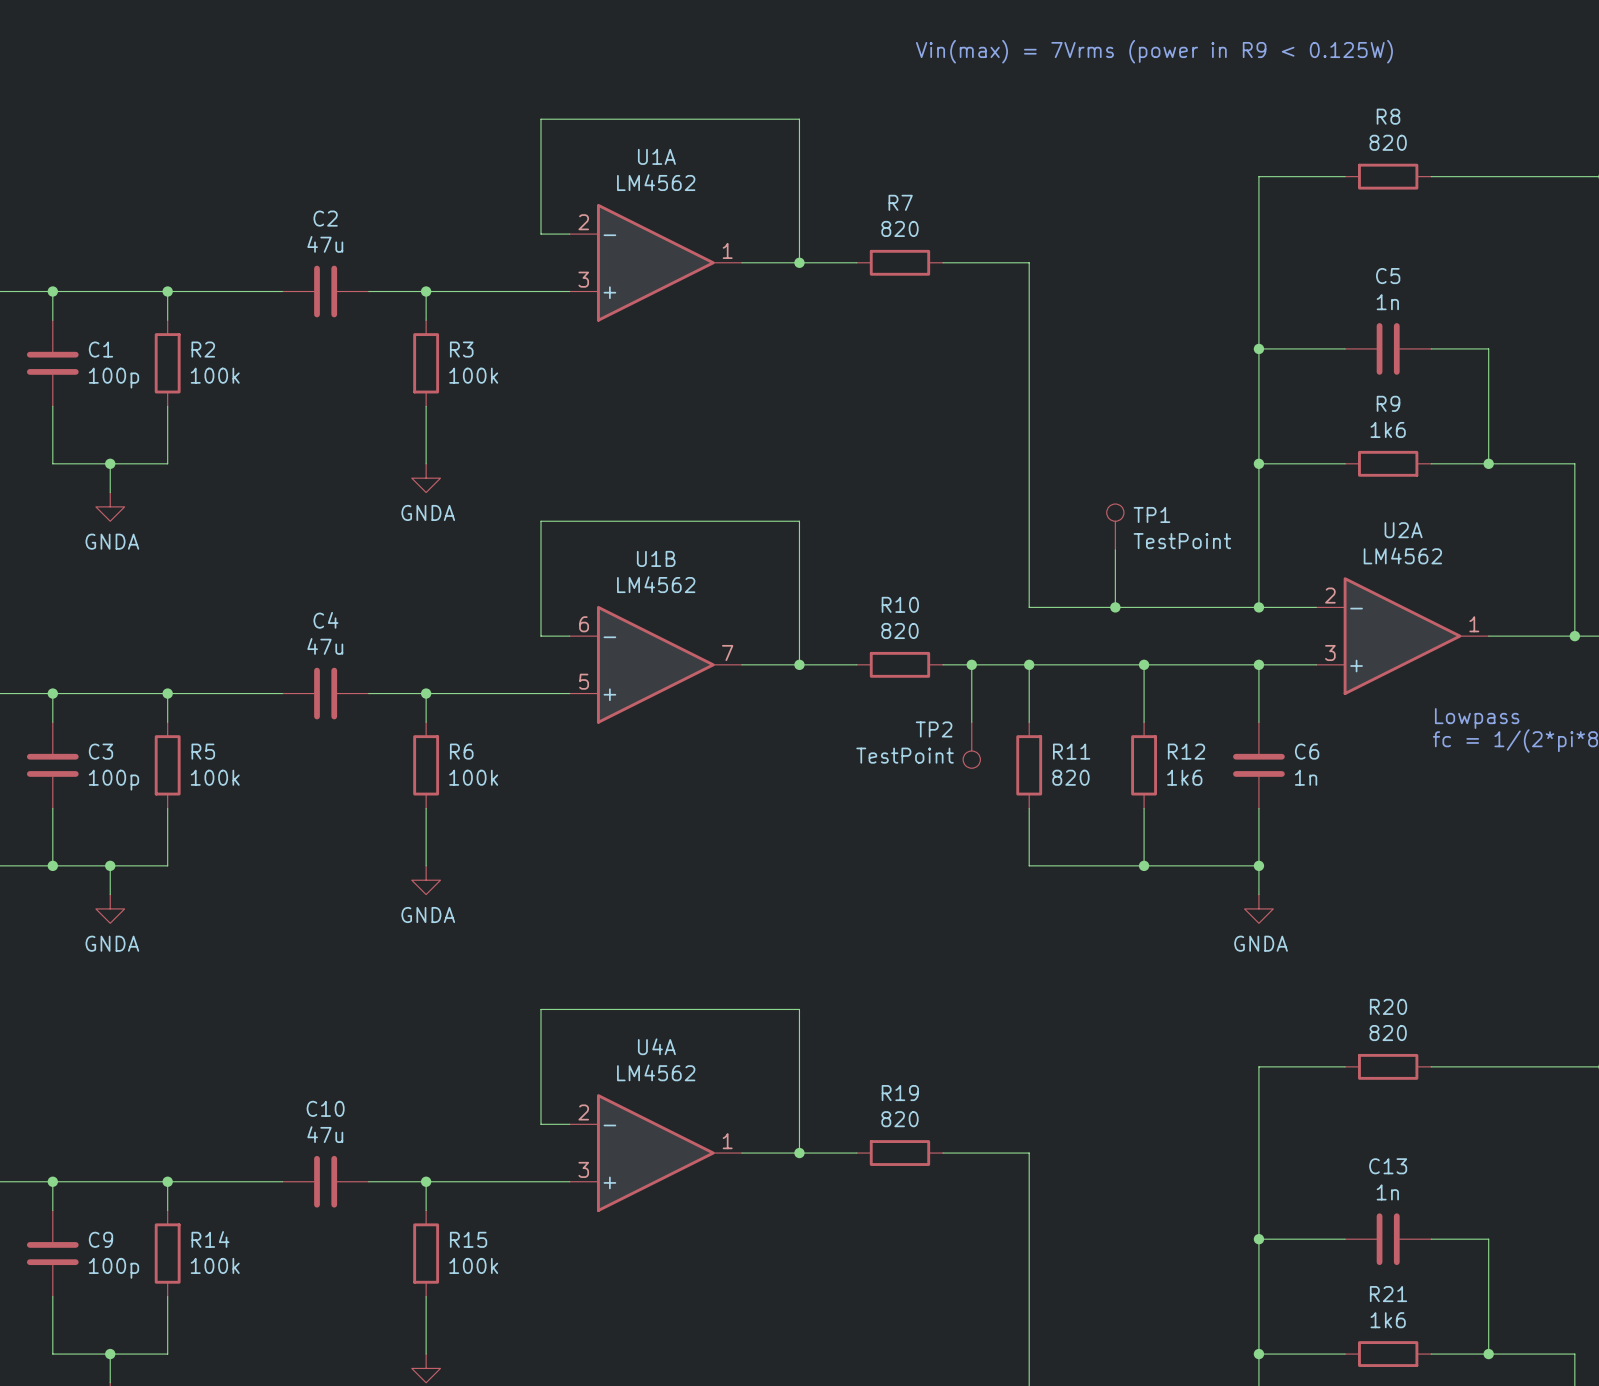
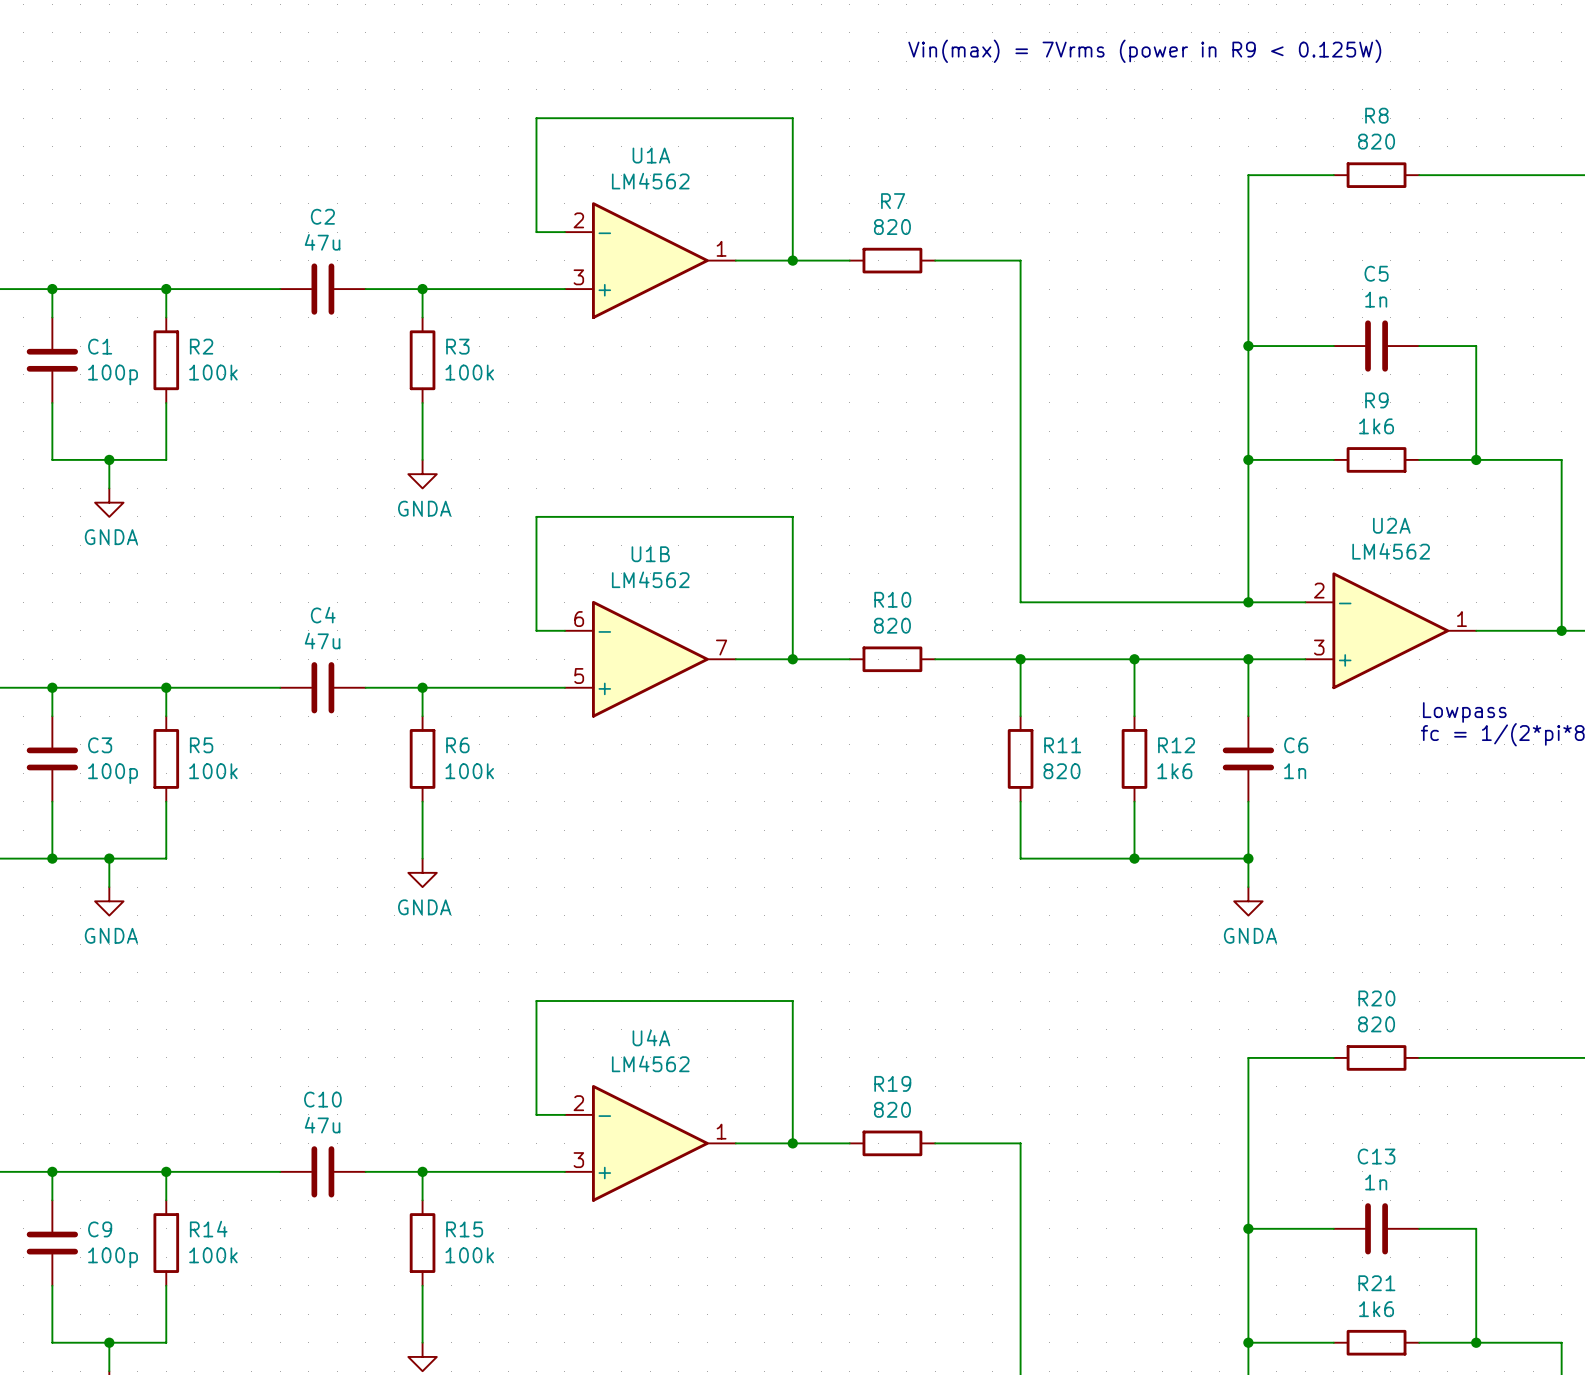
TP1: TestPoint (1115, 526) -> none
wire: (1115, 549) (1115, 607) -> none
junction: (1115, 607) -> none
wire: (971, 664) (971, 722) -> none
junction: (971, 664) -> none
TP2: TestPoint (971, 745) -> none

